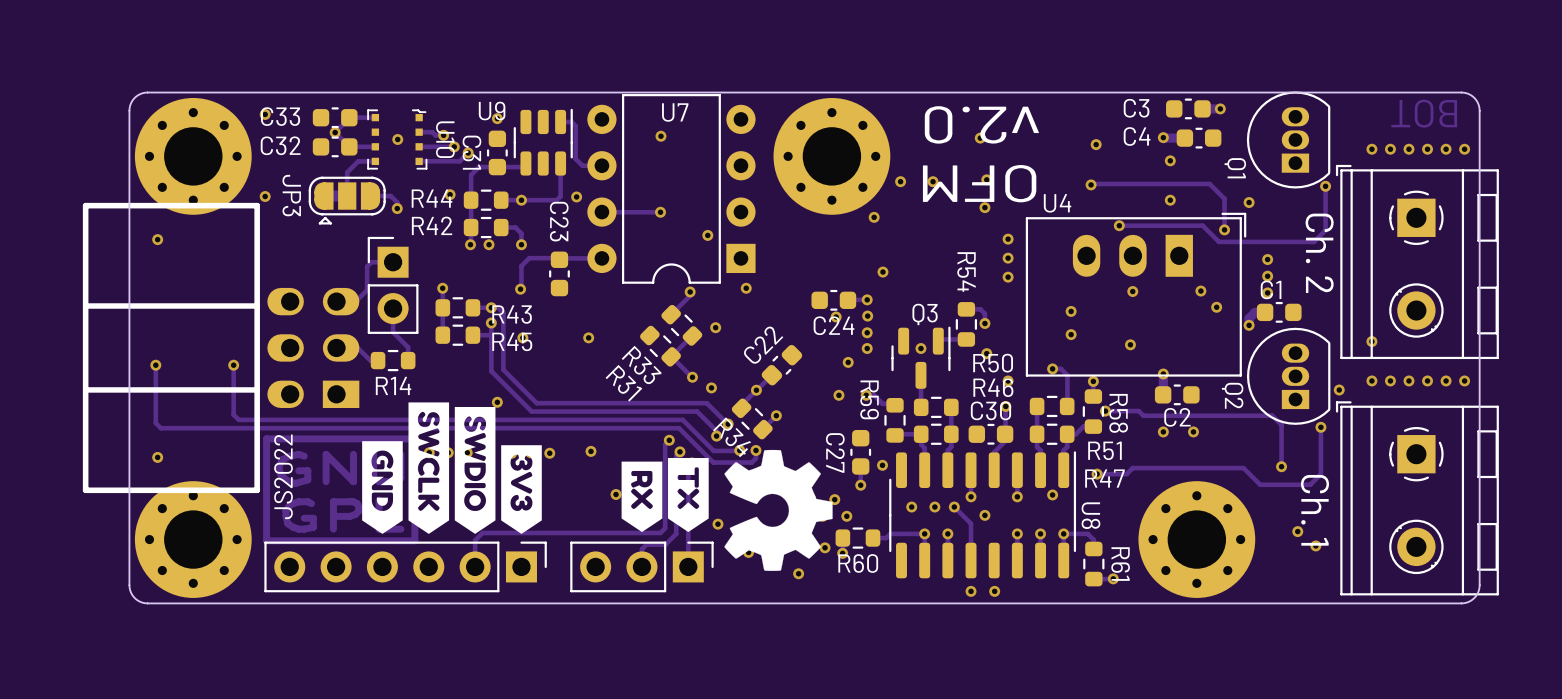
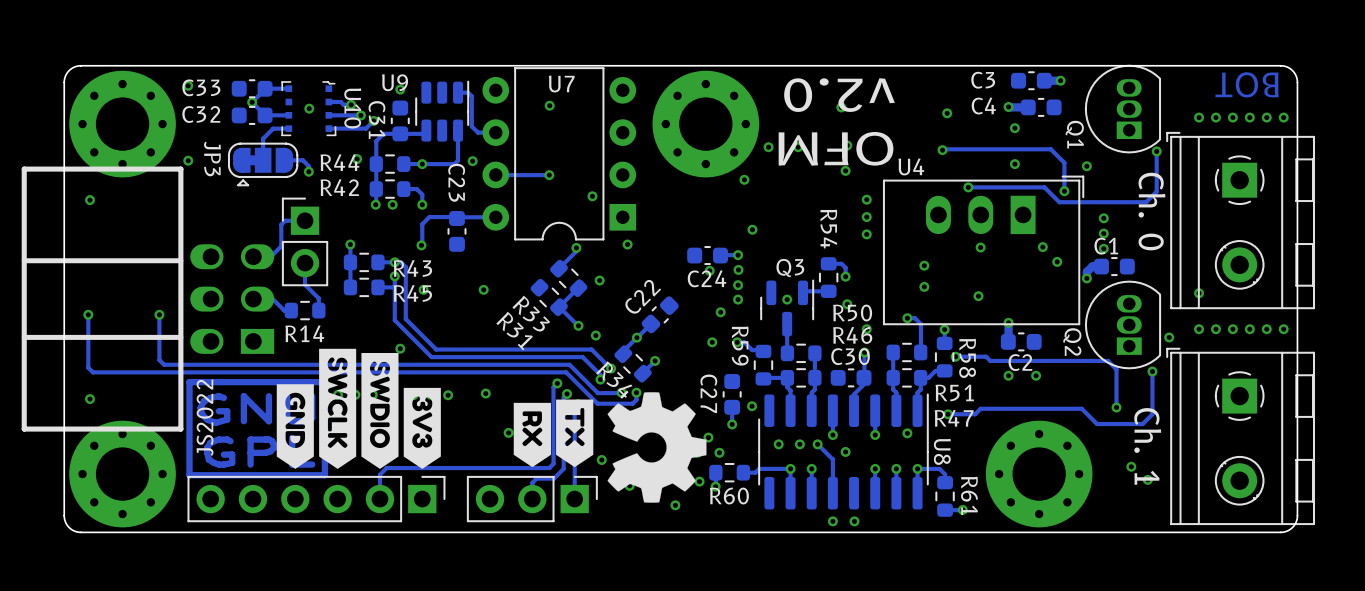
text: Ch. 2 (1319, 253) -> Ch. 0 (1151, 211)

